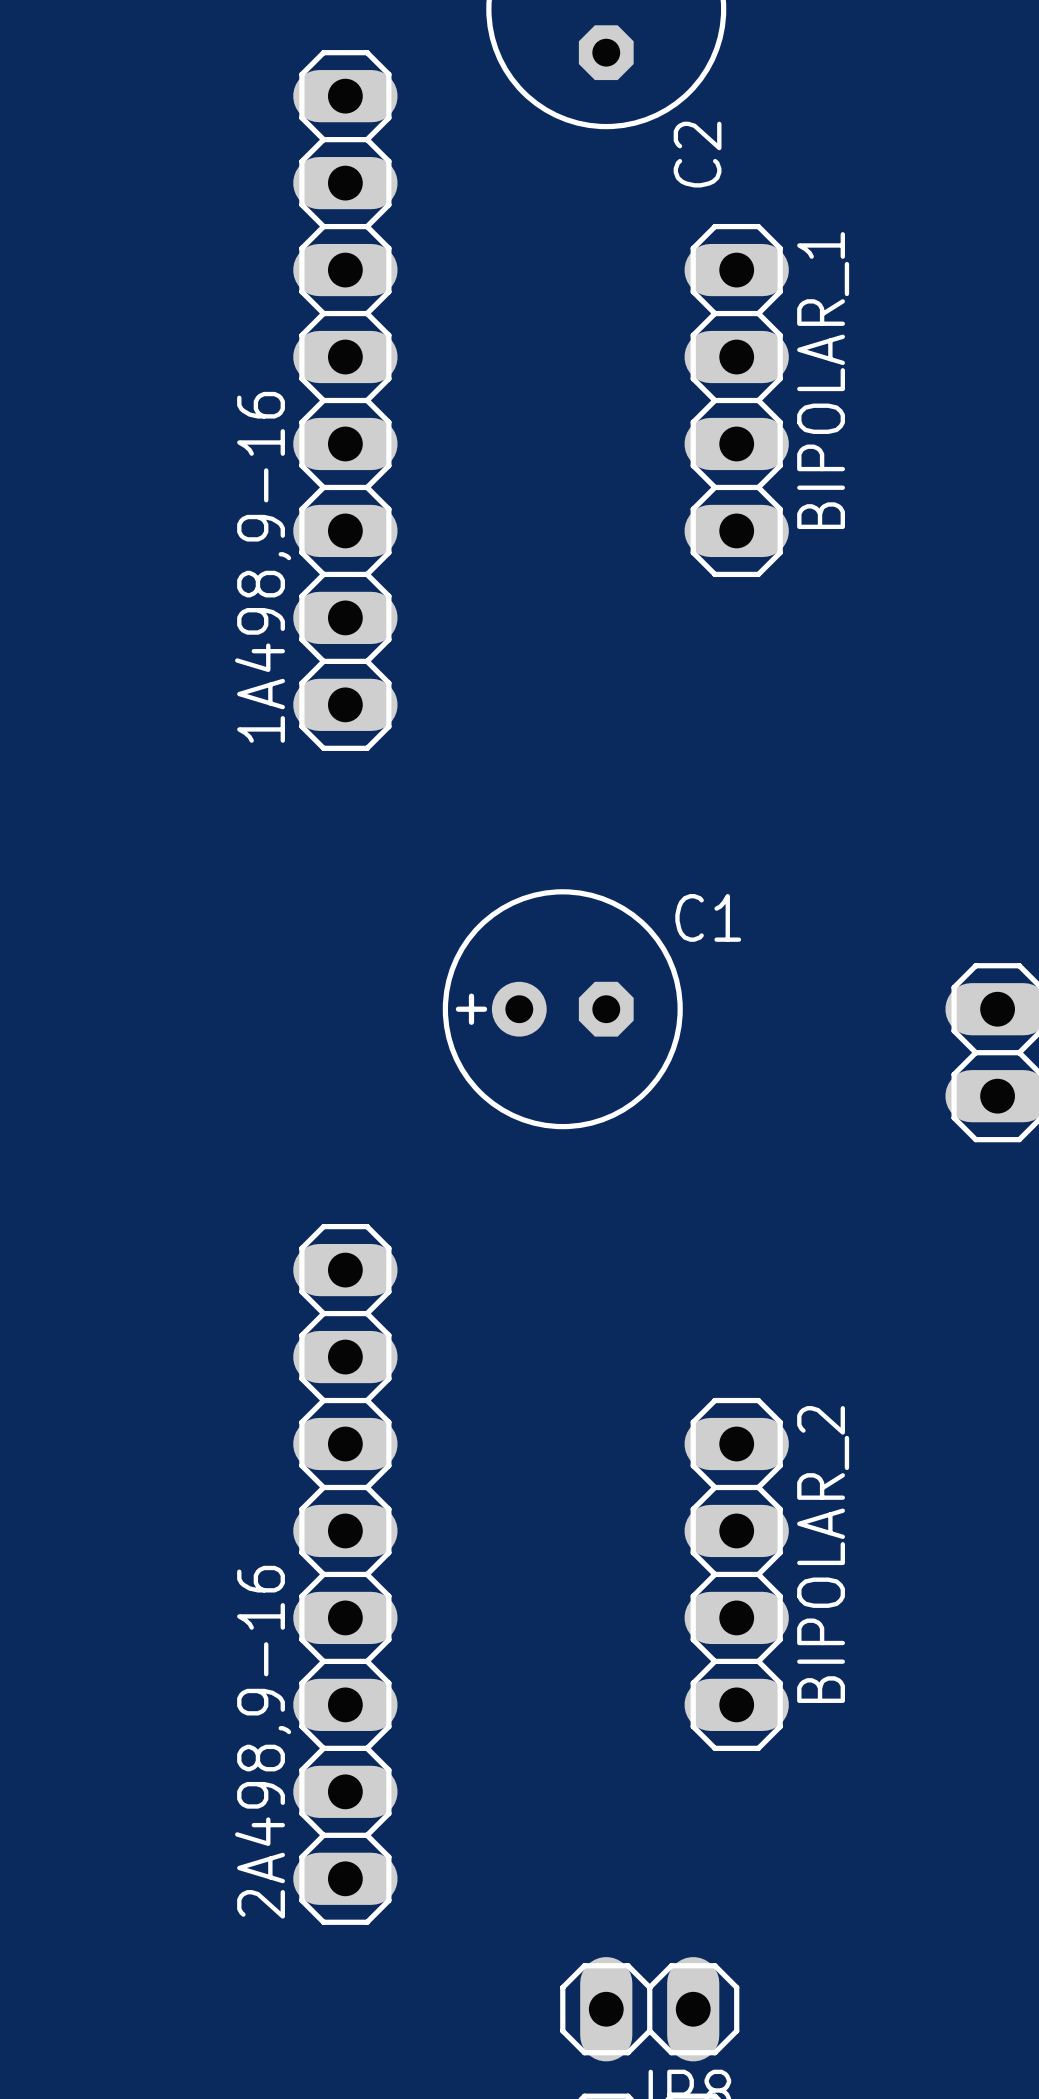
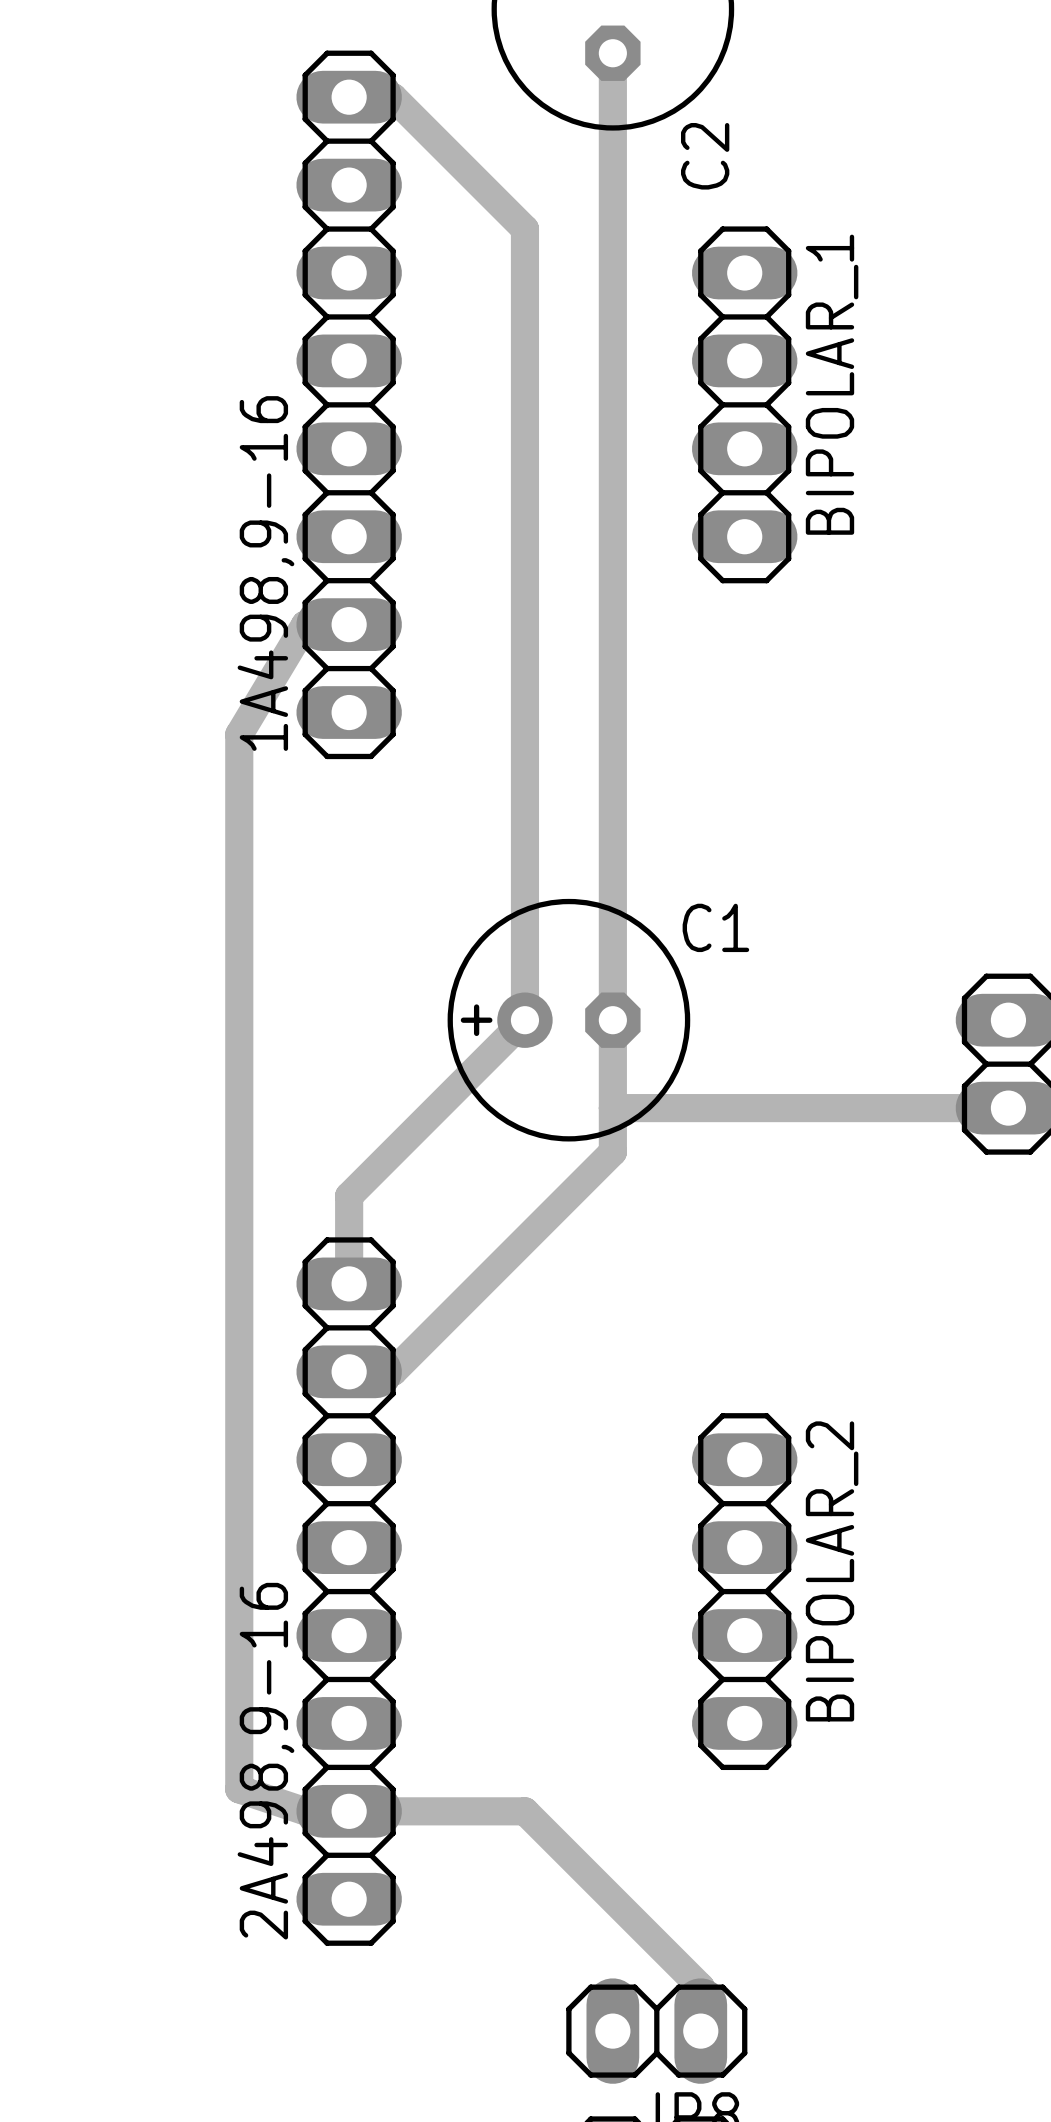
track: none -> (612, 53) (612, 1152) (393, 1371) (349, 1371)
track: none -> (349, 97) (393, 97) (524, 229) (524, 1020) (349, 1196) (349, 1283)
track: none -> (349, 624) (305, 624) (239, 734) (239, 1789) (305, 1811) (524, 1811) (700, 1987) (700, 2031)
track: none -> (612, 1108) (1008, 1108)

